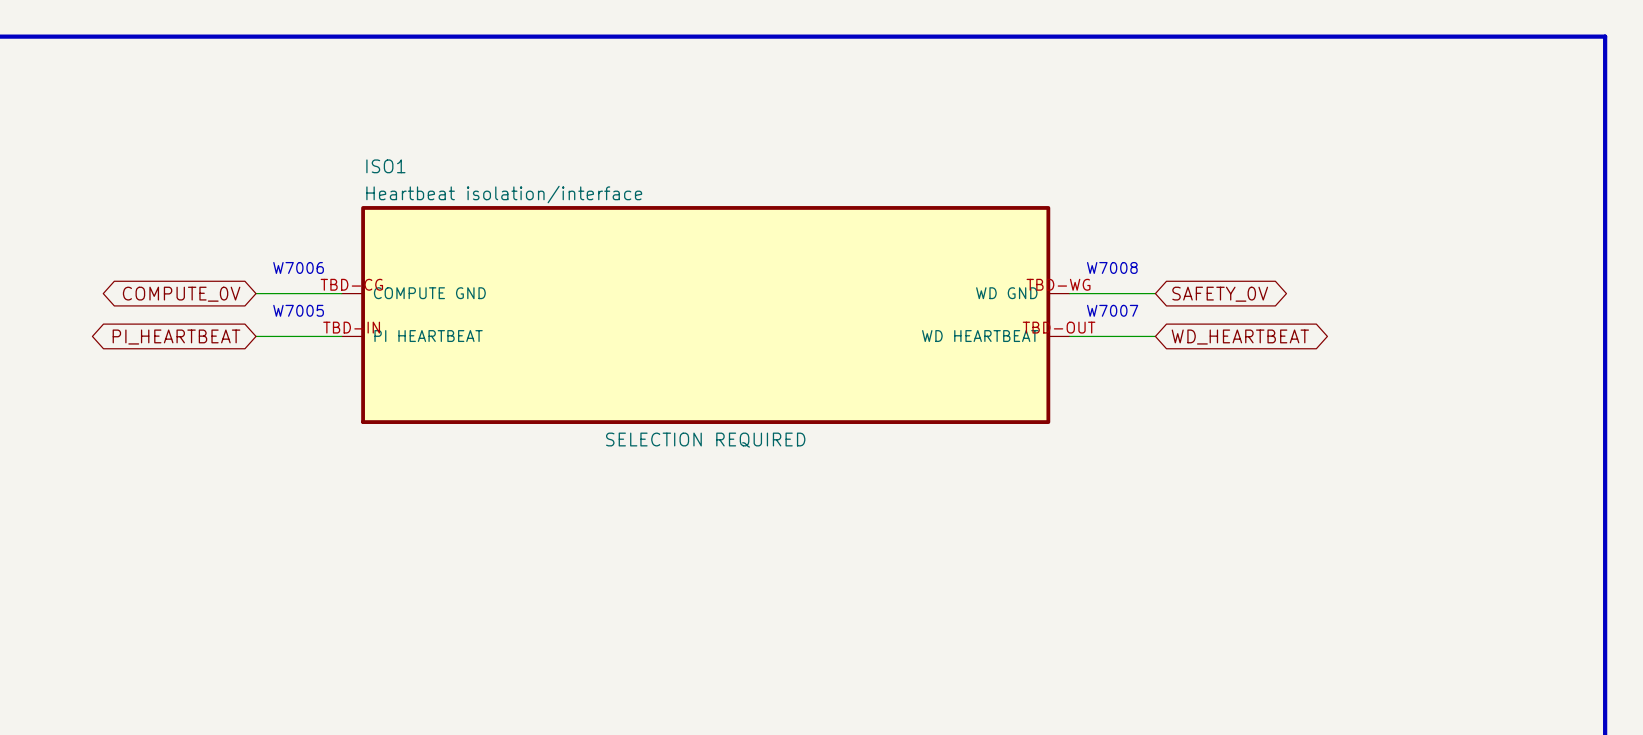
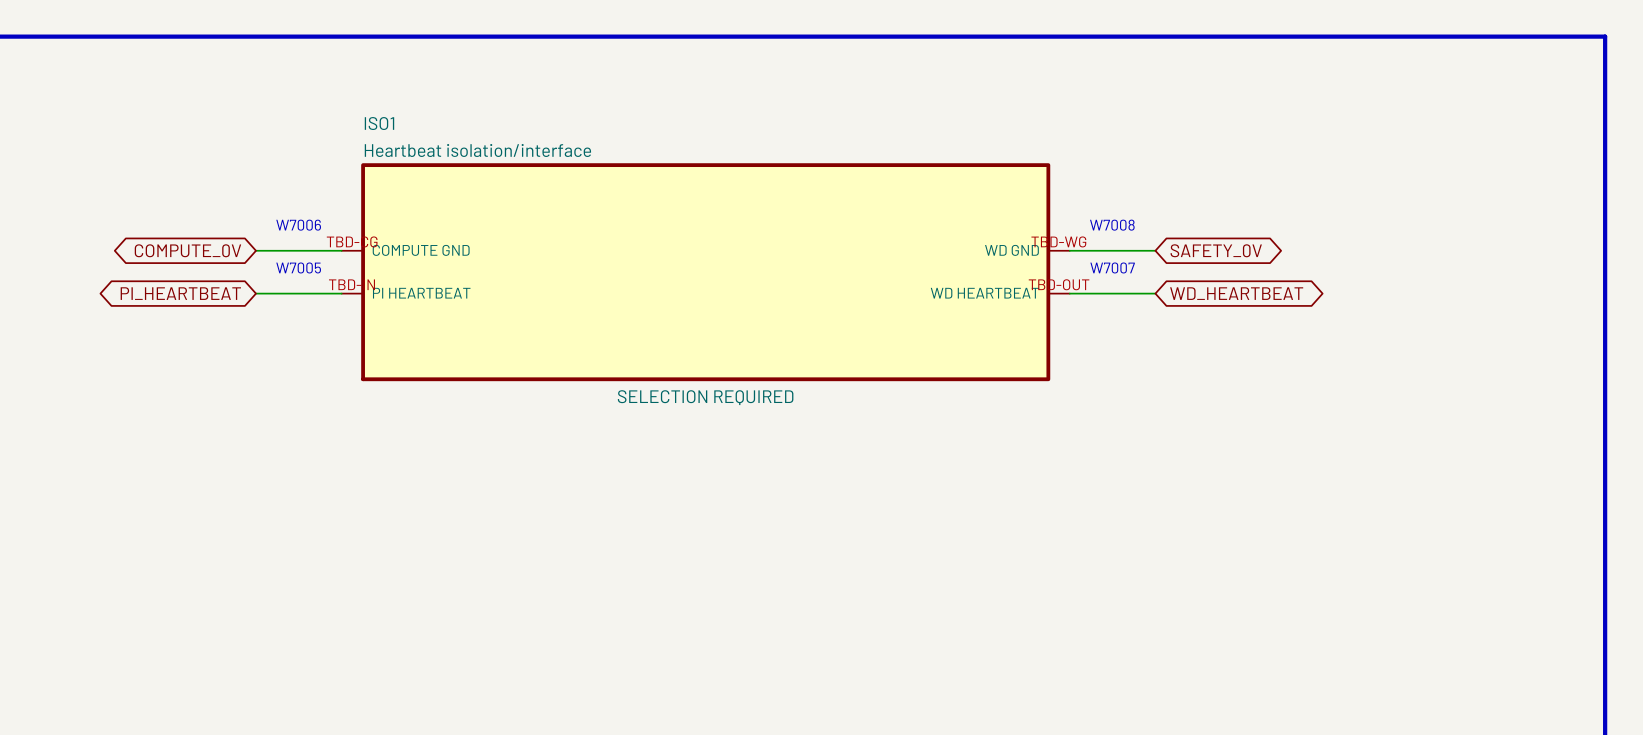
text: none -> W7006 (298, 225)
text: none -> W7008 (1112, 225)
global label: none -> COMPUTE_0V (187, 250)
global label: none -> SAFETY_0V (1216, 250)
text: W7006 (298, 267) -> W7005 (298, 267)
text: W7008 (1112, 267) -> W7007 (1112, 267)
global label: COMPUTE_0V (181, 294) -> PI_HEARTBEAT (180, 293)
global label: SAFETY_0V (1220, 294) -> WD_HEARTBEAT (1236, 293)
text: W7005 (298, 310) -> none
text: W7007 (1112, 310) -> none
ISO1 position: (705, 315) -> (705, 272)
wire: (256, 336) (341, 336) -> (256, 250) (341, 250)
wire: (1069, 336) (1155, 336) -> (1069, 250) (1155, 250)
global label: PI_HEARTBEAT (176, 337) -> none
global label: WD_HEARTBEAT (1240, 337) -> none

